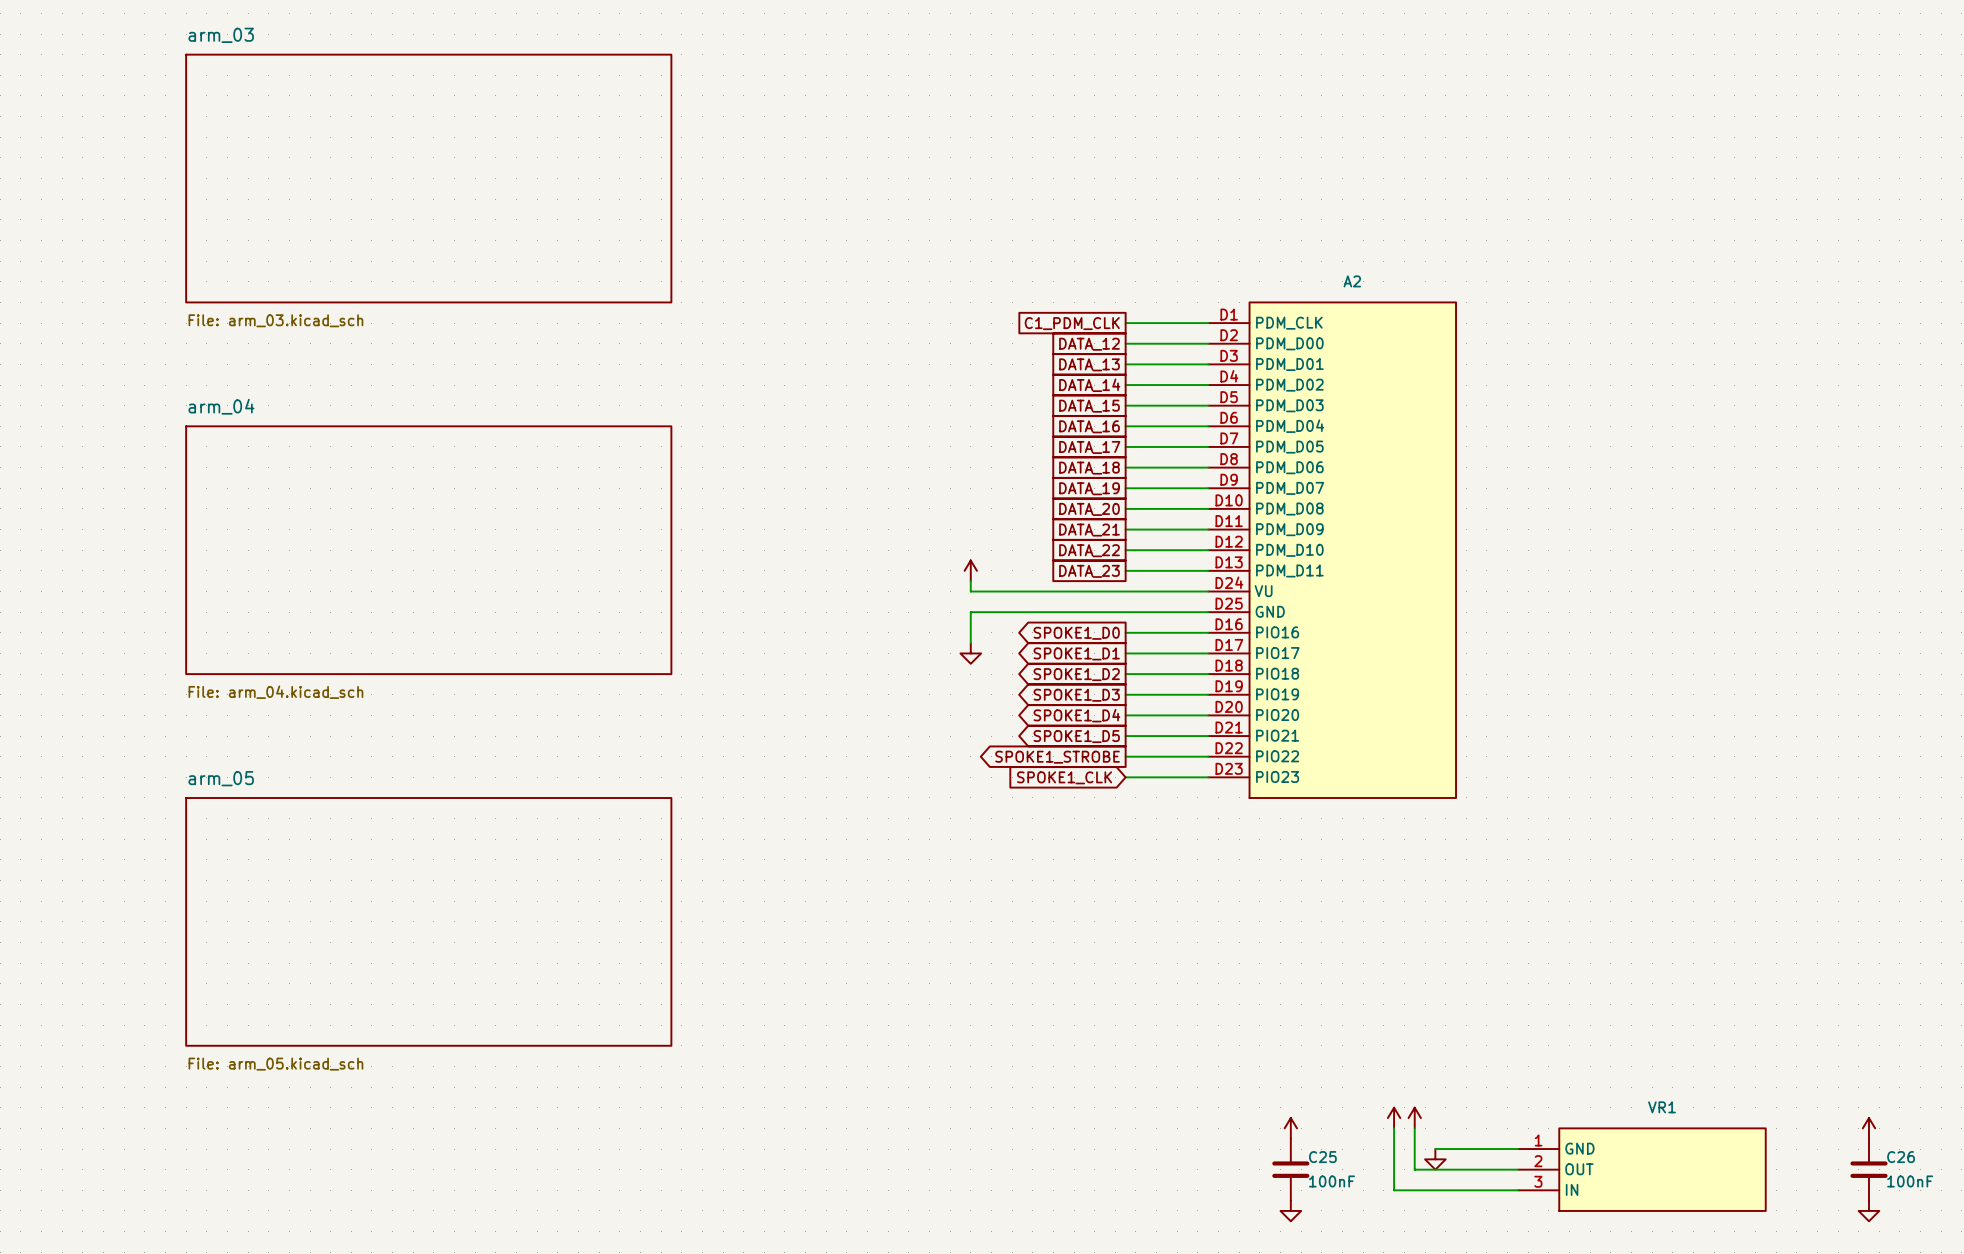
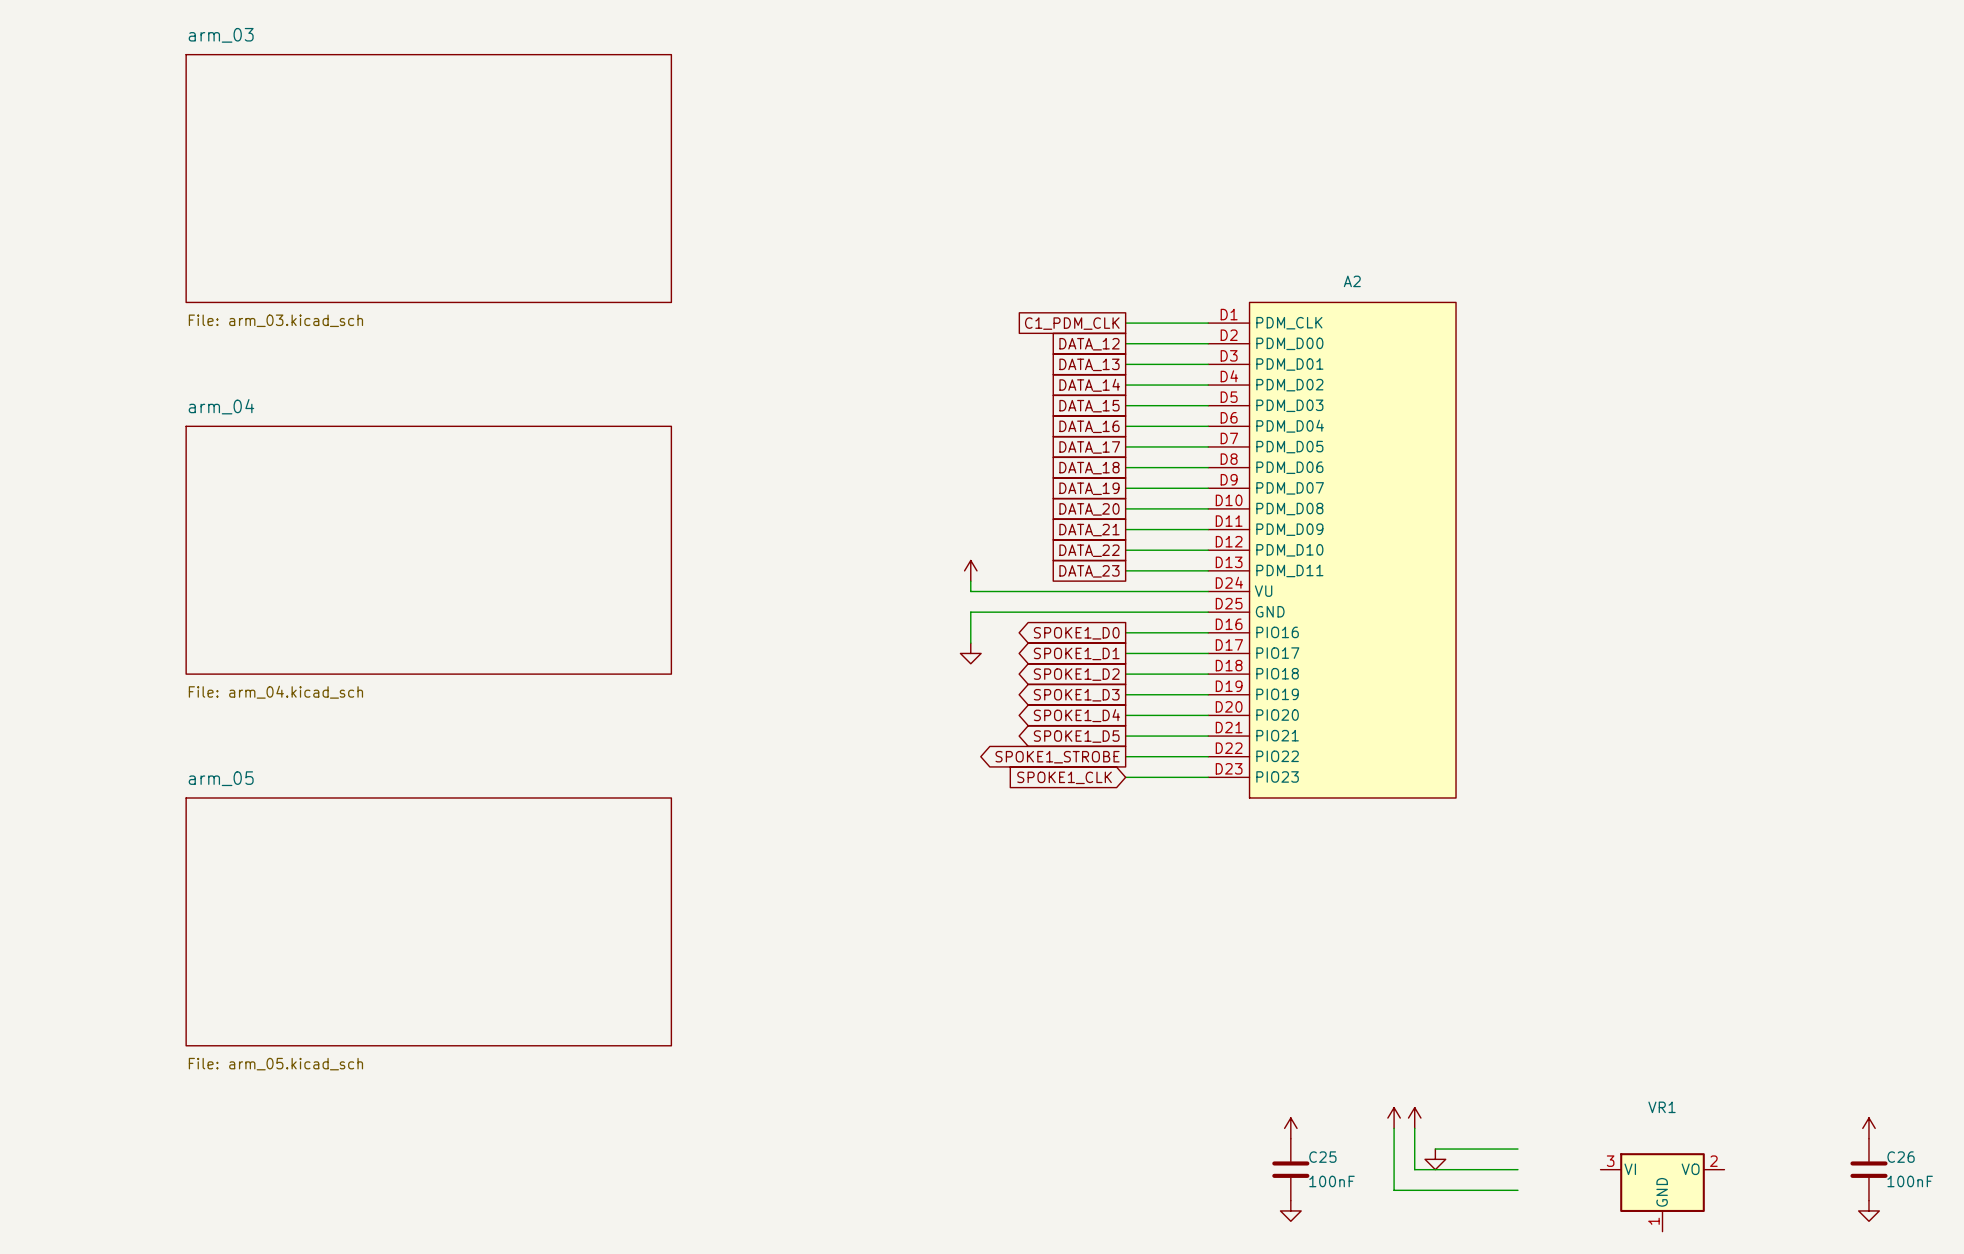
VR1 symbol: [1517, 1128, 1766, 1211] -> [1600, 1153, 1725, 1232]

